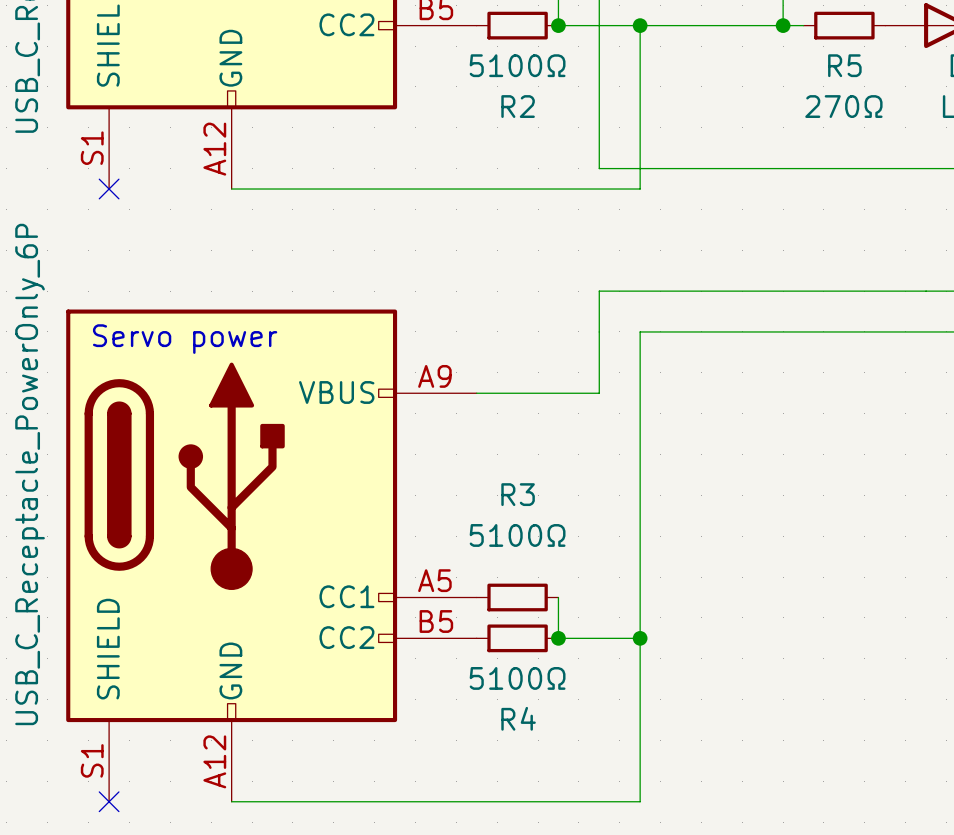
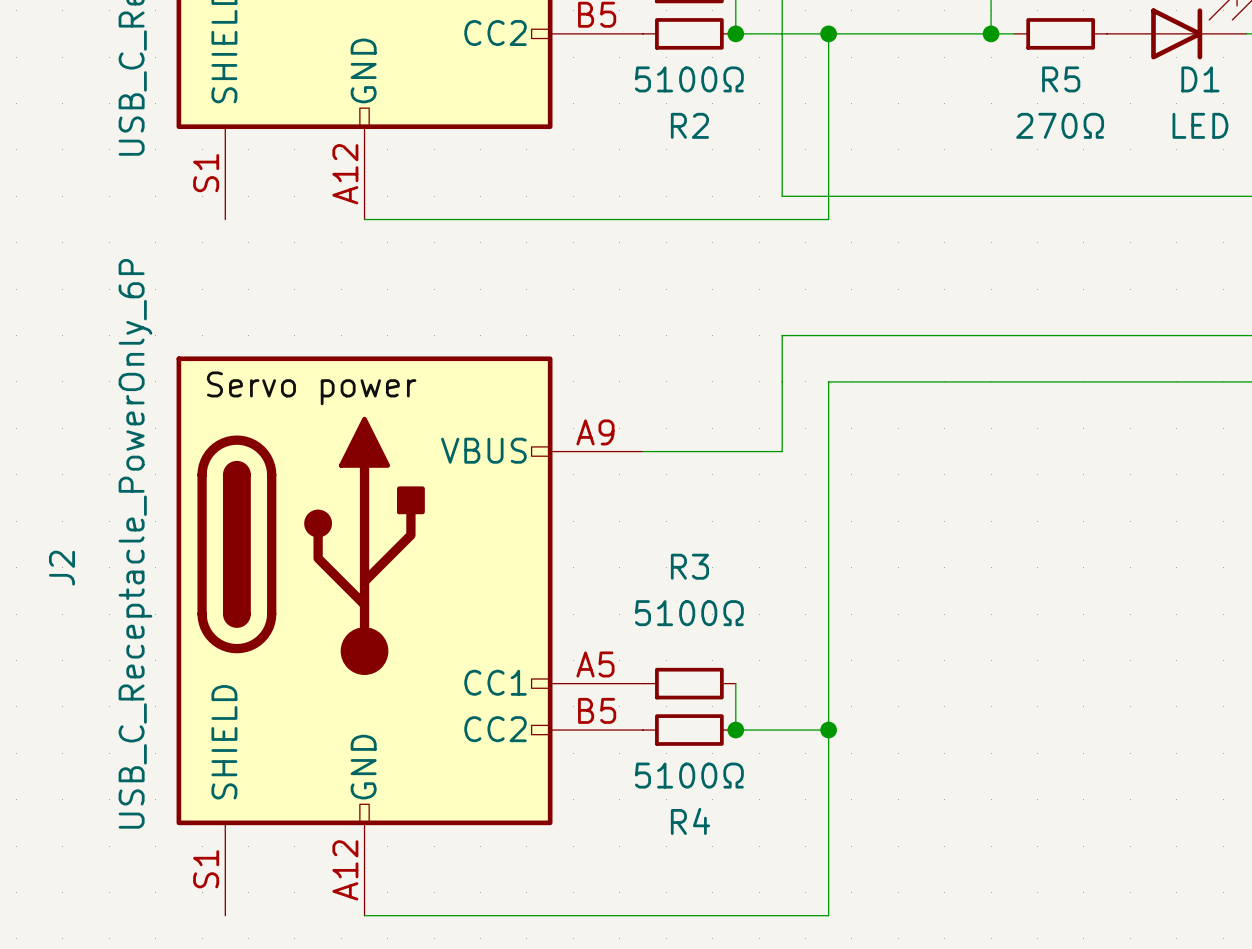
no-connect mark: (109, 189) -> none
label: none -> Servo power (311, 388)
text: Servo power (185, 339) -> none
no-connect mark: (109, 801) -> none

